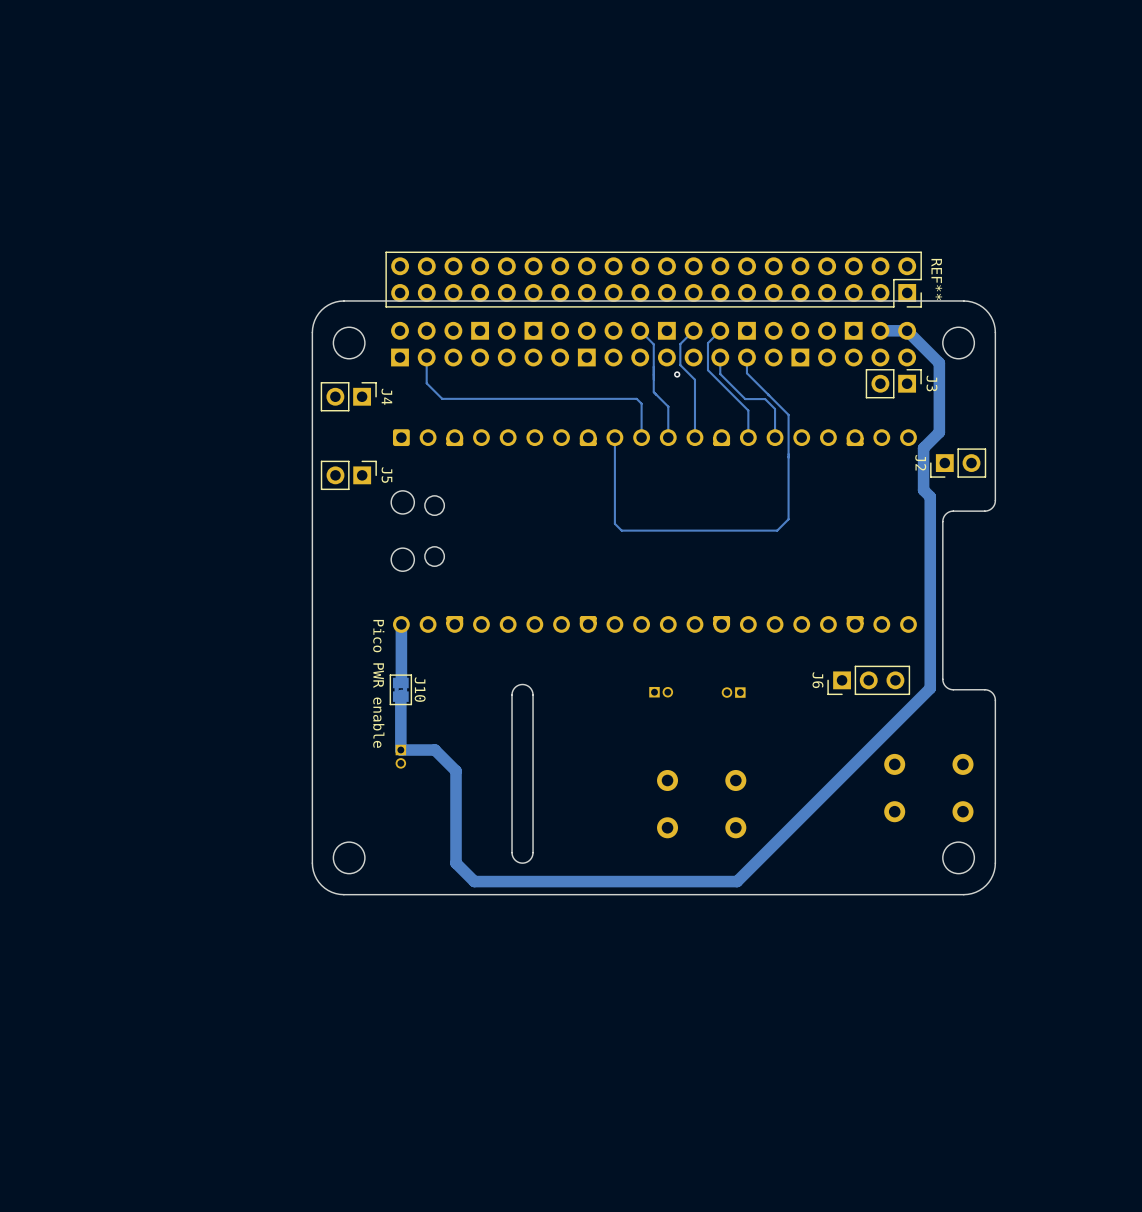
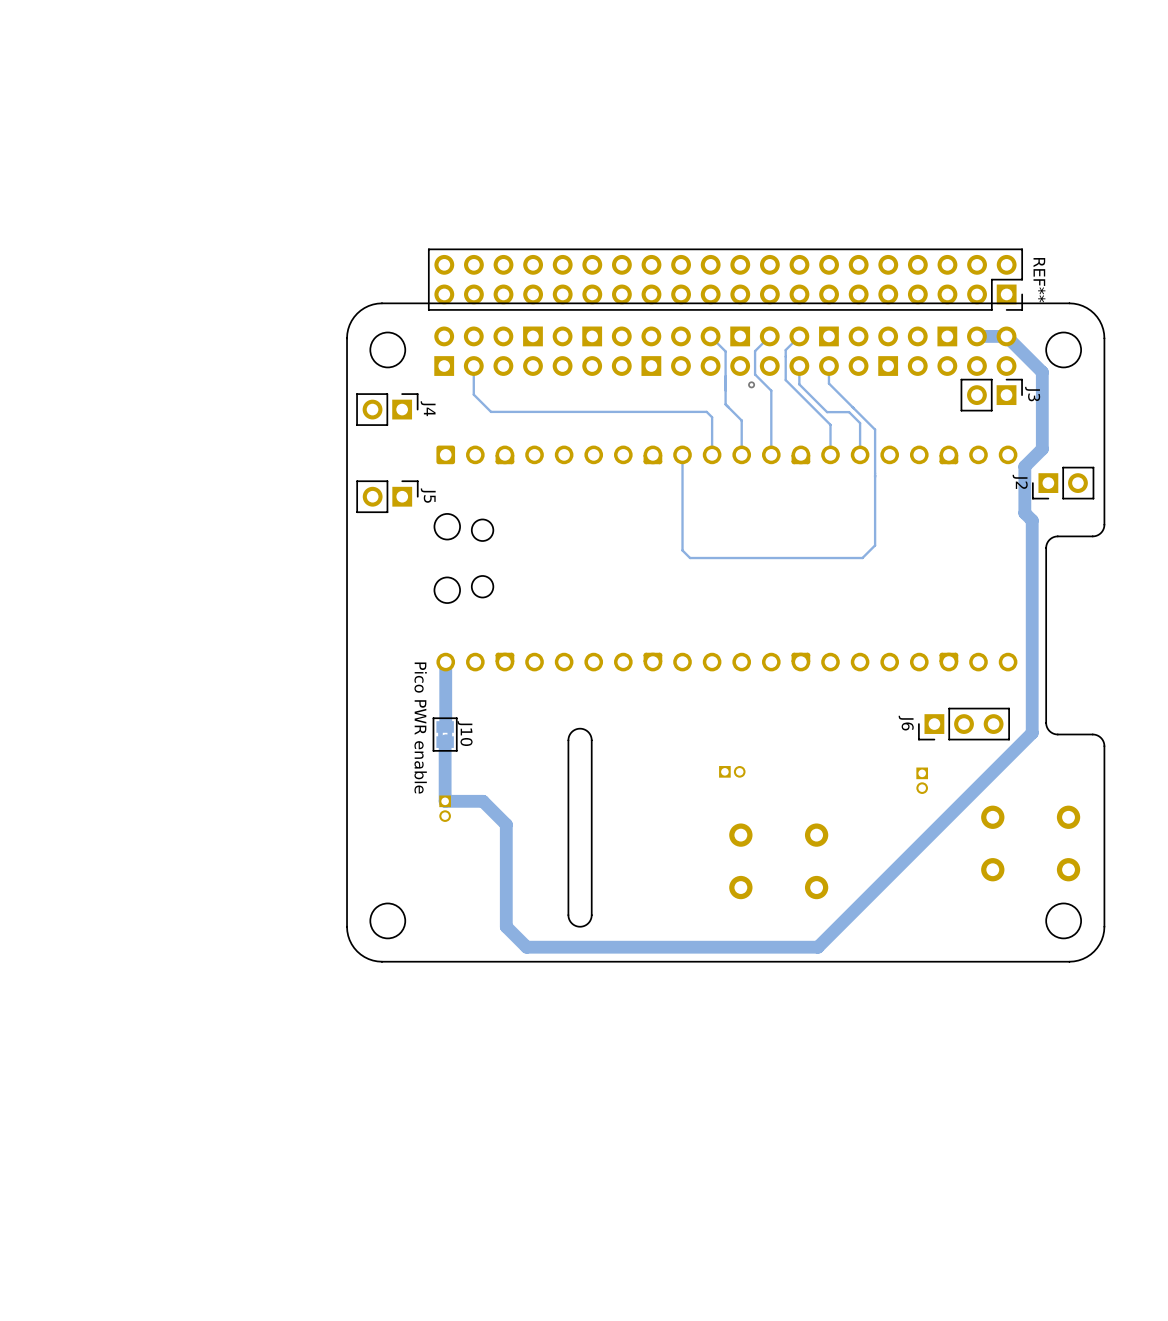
part position: (661, 692) -> (732, 771)
part: (733, 692) -> none
part: none -> (922, 780)

